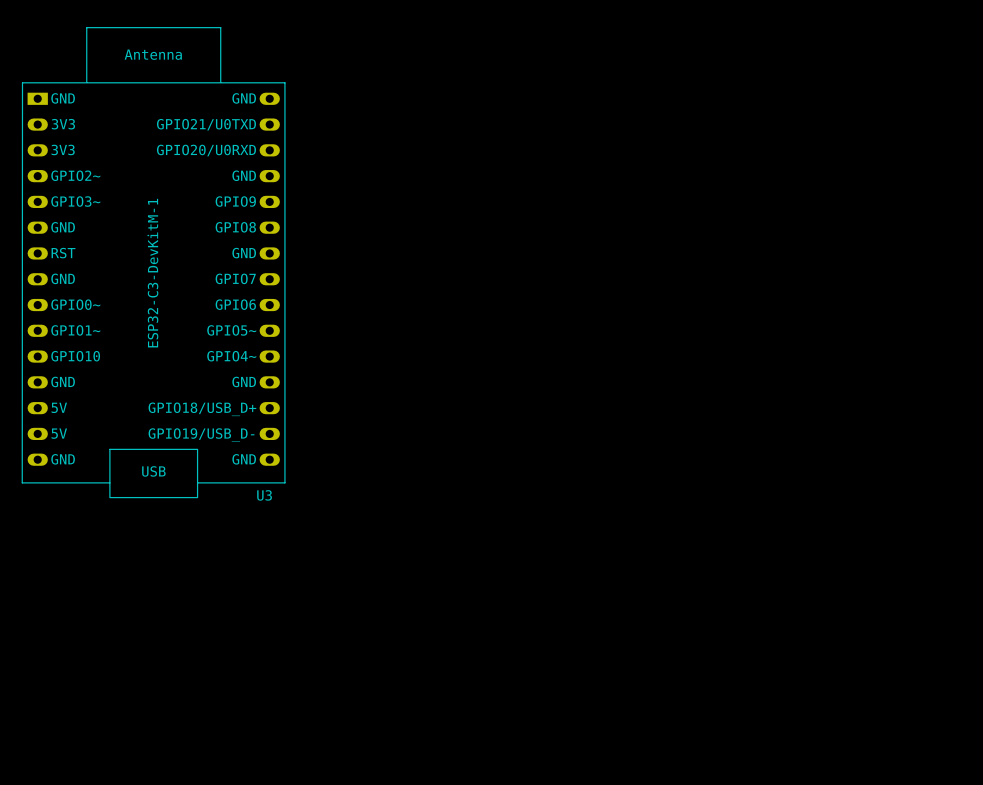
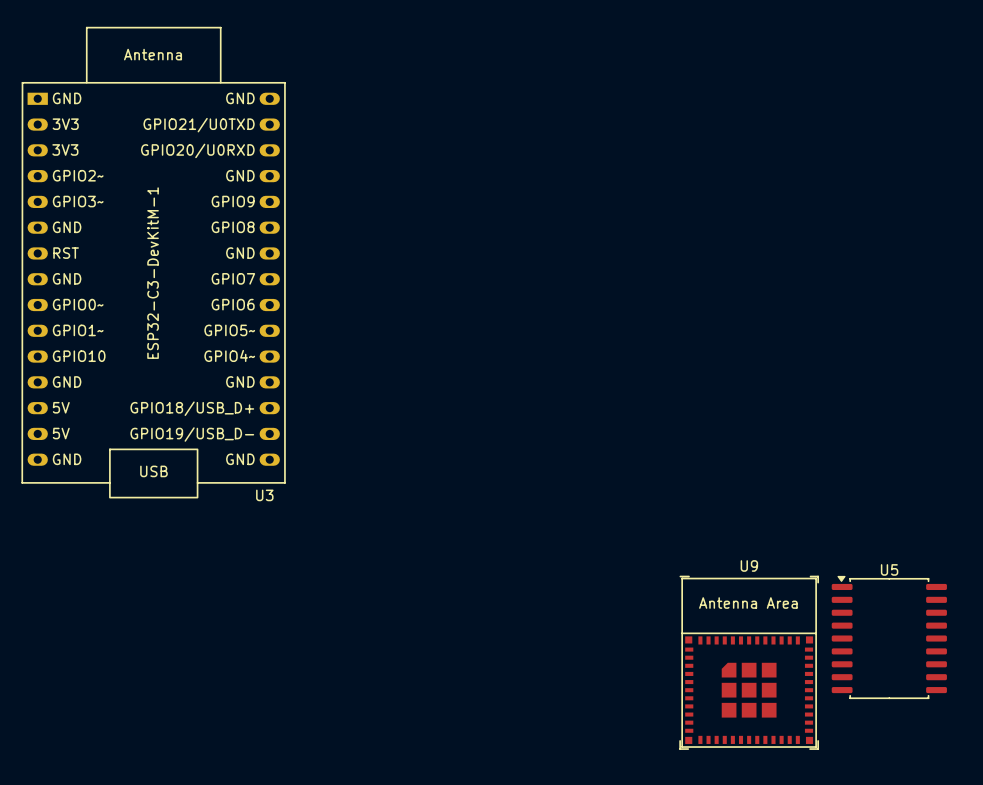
U5: none -> (889, 637)
U9: none -> (749, 662)

